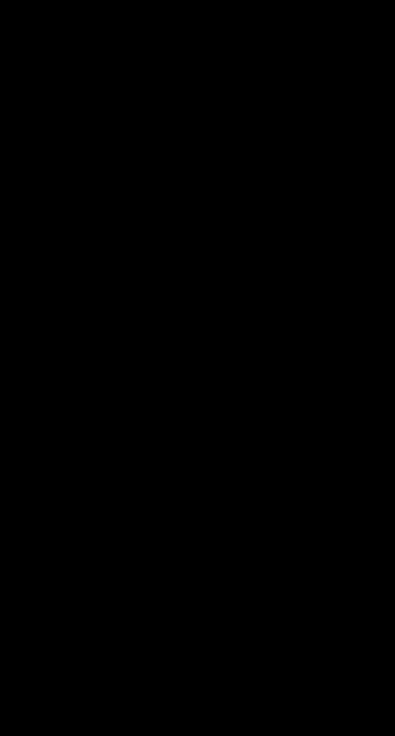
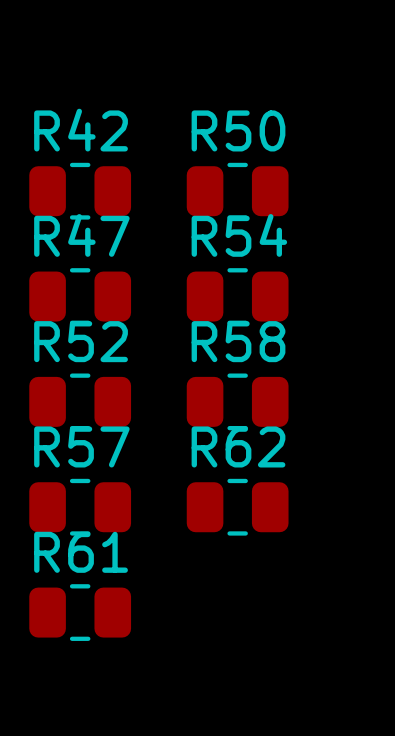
R42: none -> (80, 191)
R50: none -> (237, 191)
R47: none -> (80, 296)
R54: none -> (237, 296)
R52: none -> (80, 401)
R58: none -> (237, 401)
R57: none -> (80, 507)
R62: none -> (237, 507)
R61: none -> (80, 612)

